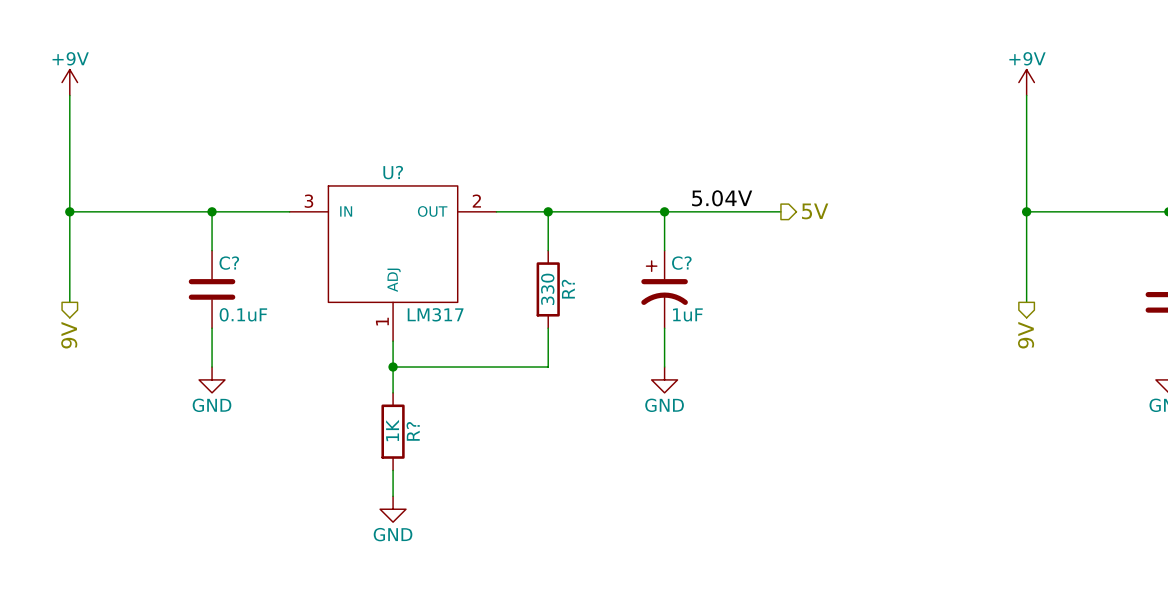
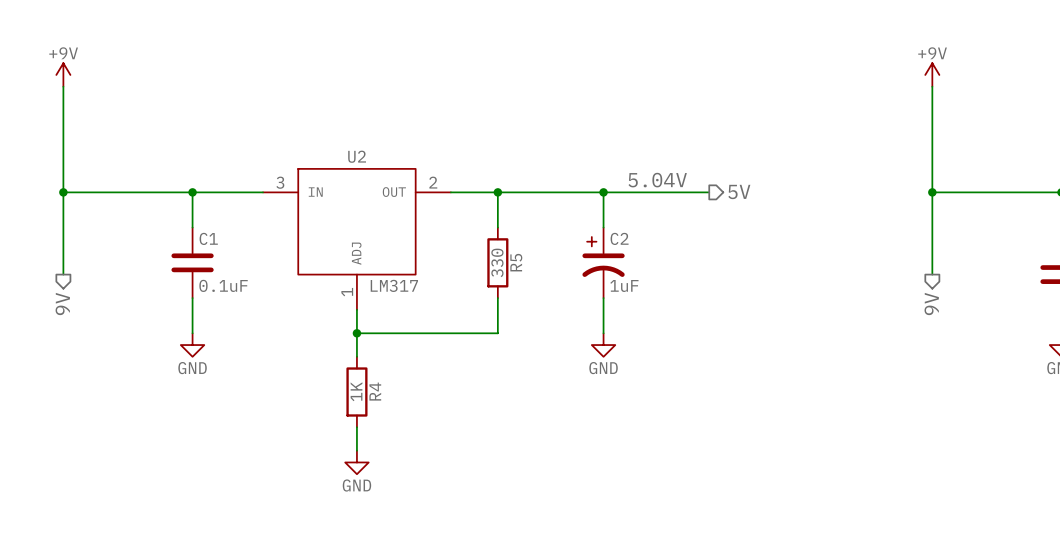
U? name: U? (393, 172) -> U2 (357, 156)
C? name: C? (229, 263) -> C1 (208, 238)
C? name: C? (681, 263) -> C2 (619, 238)
R? name: R? (568, 289) -> R5 (516, 262)
R? name: R? (413, 431) -> R4 (375, 391)

